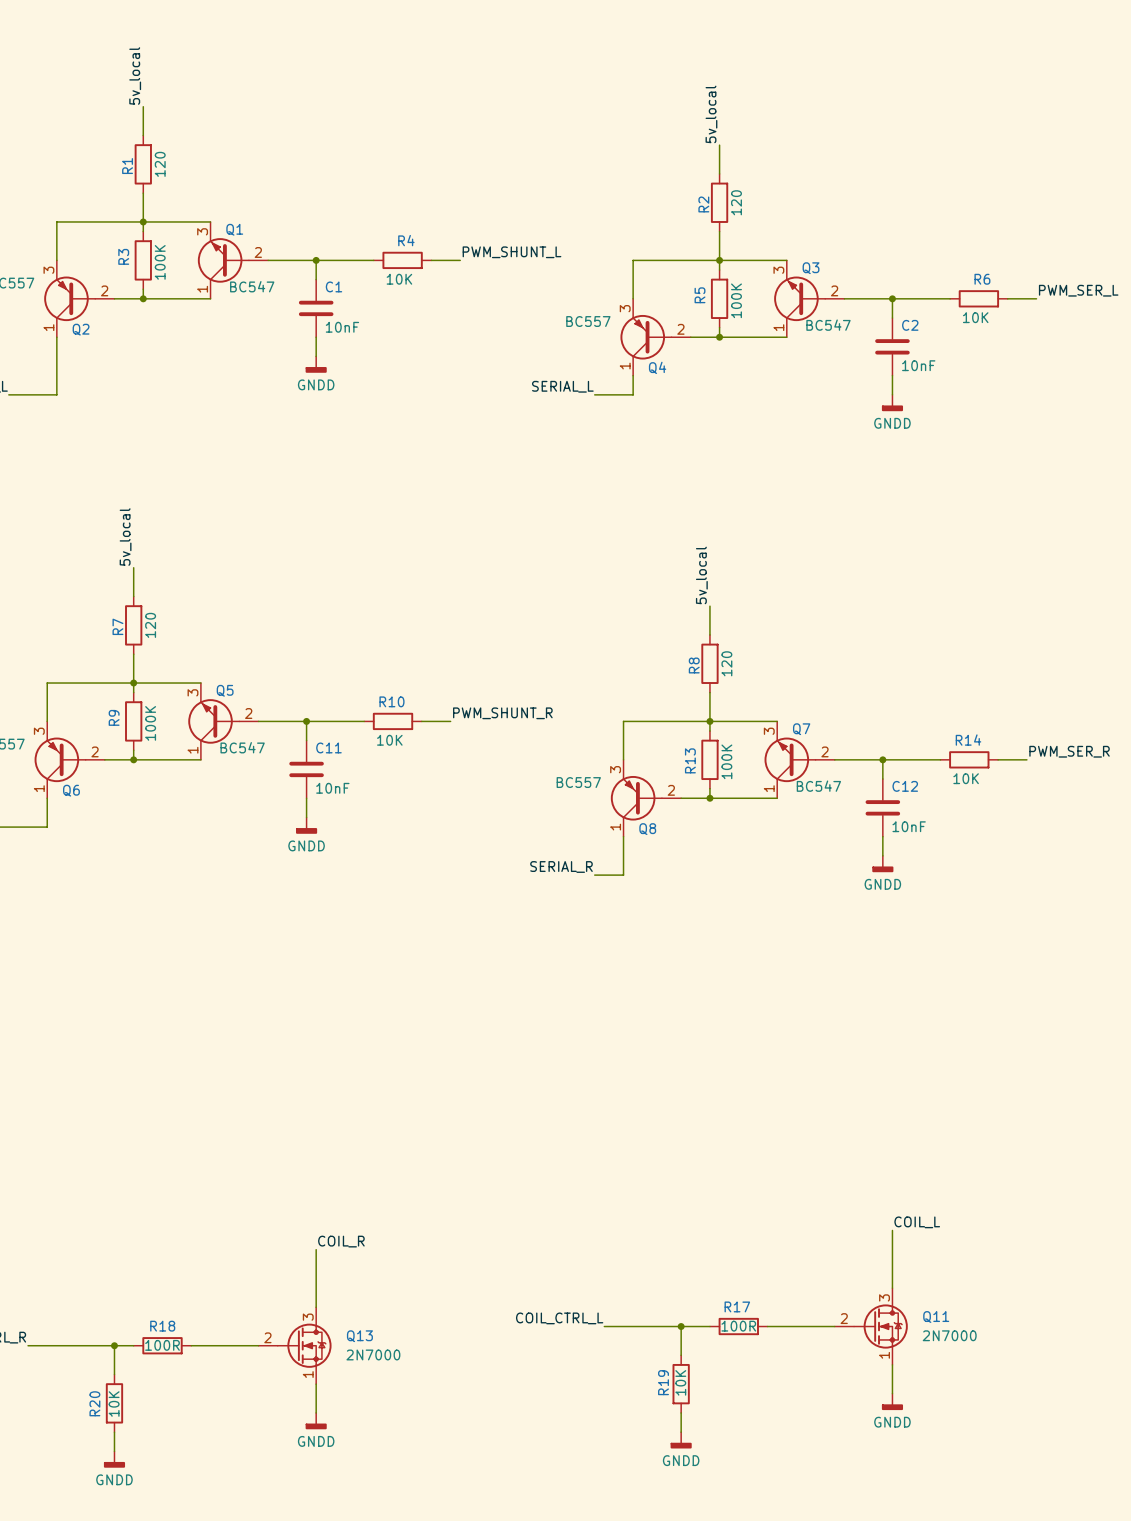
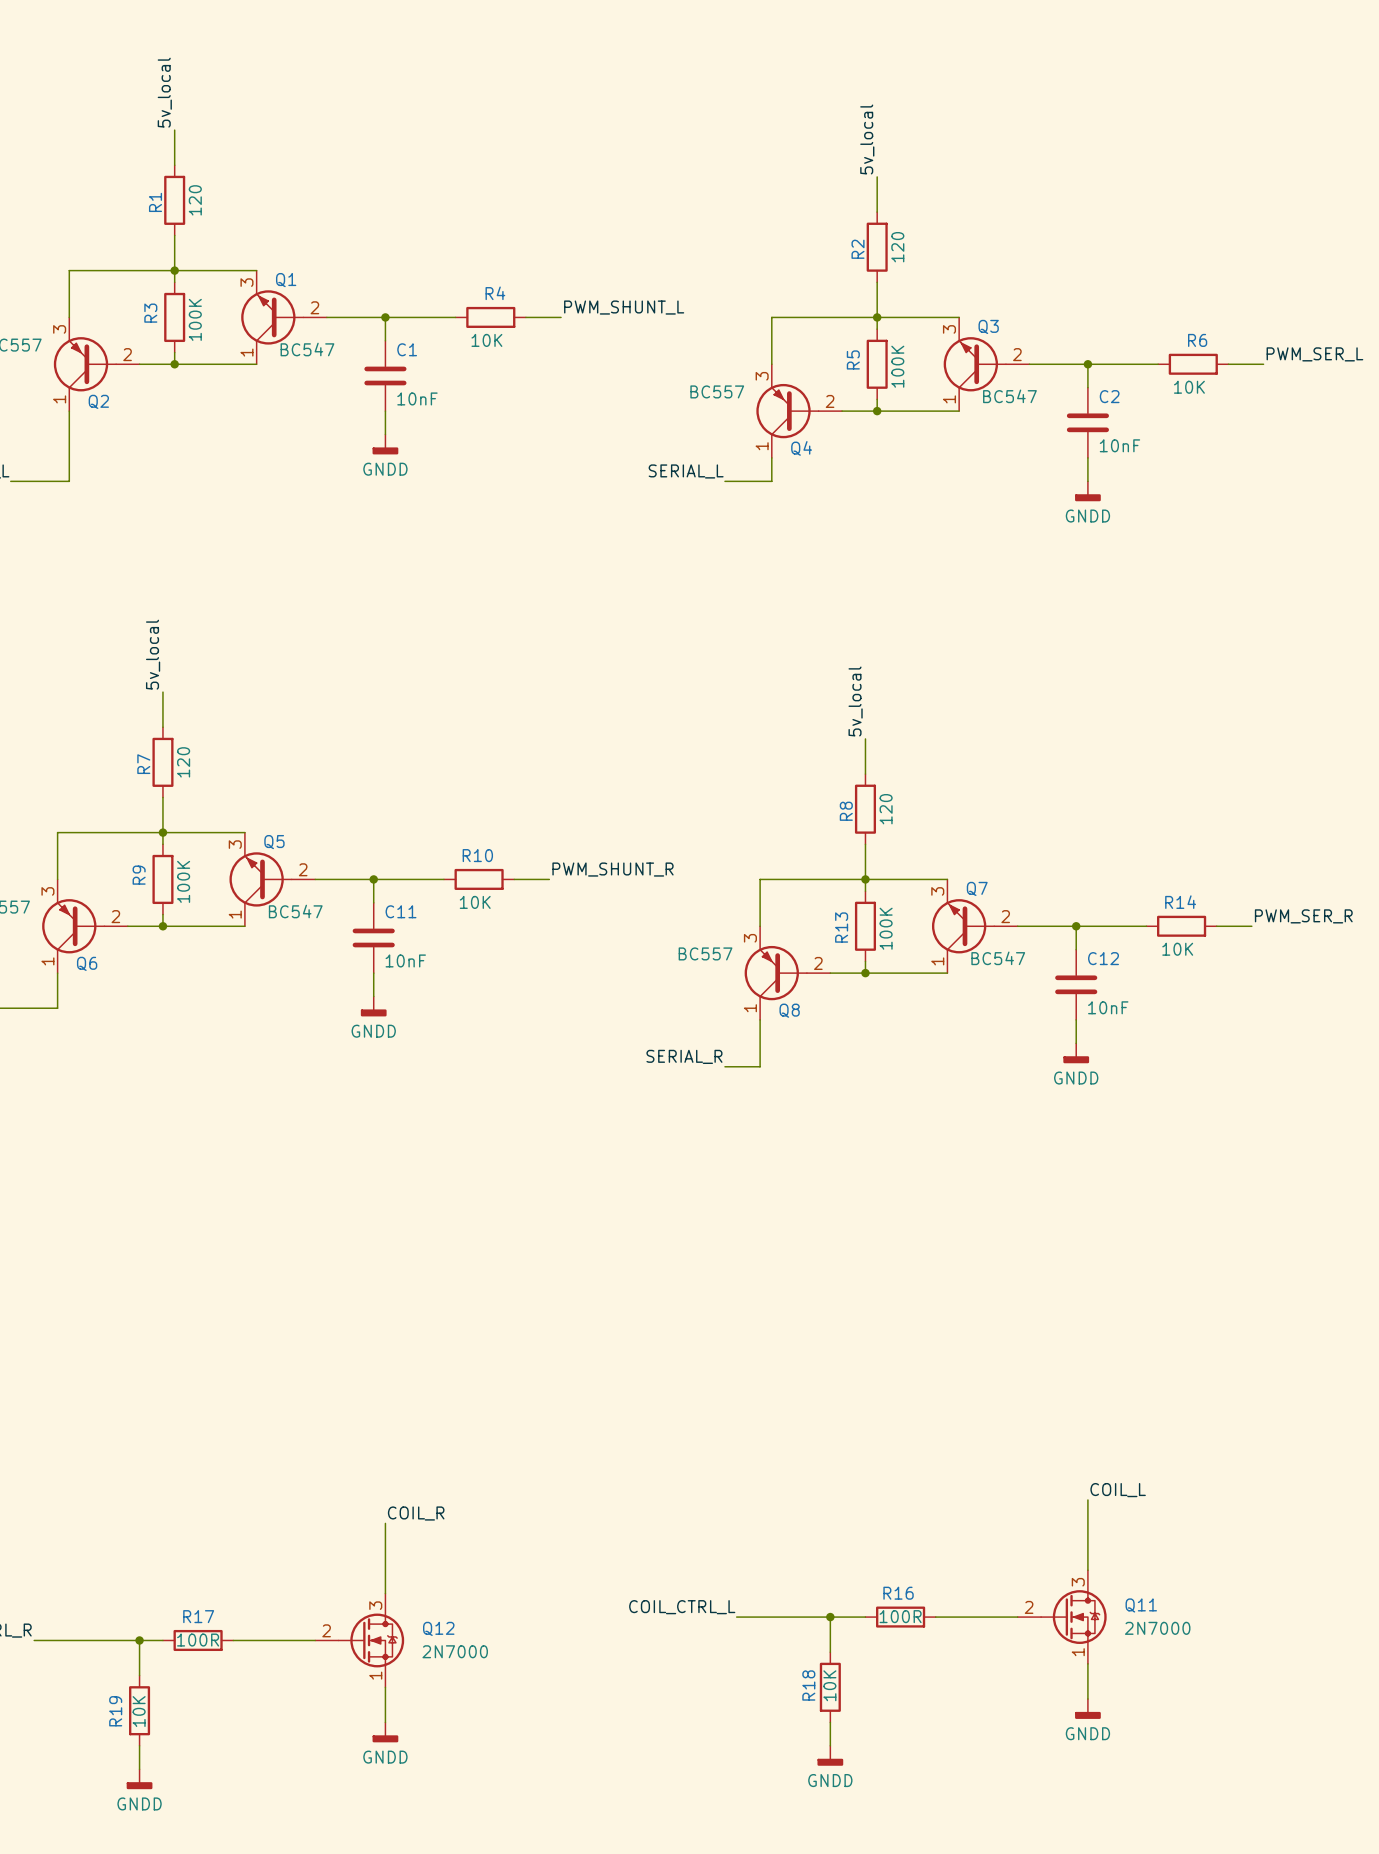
R17 name: R17 (737, 1306) -> R16 (898, 1593)
R18 name: R18 (162, 1326) -> R17 (198, 1616)
Q13 name: Q13 (359, 1336) -> Q12 (438, 1628)
R19 name: R19 (663, 1382) -> R18 (808, 1685)
R20 name: R20 (94, 1403) -> R19 (115, 1711)

